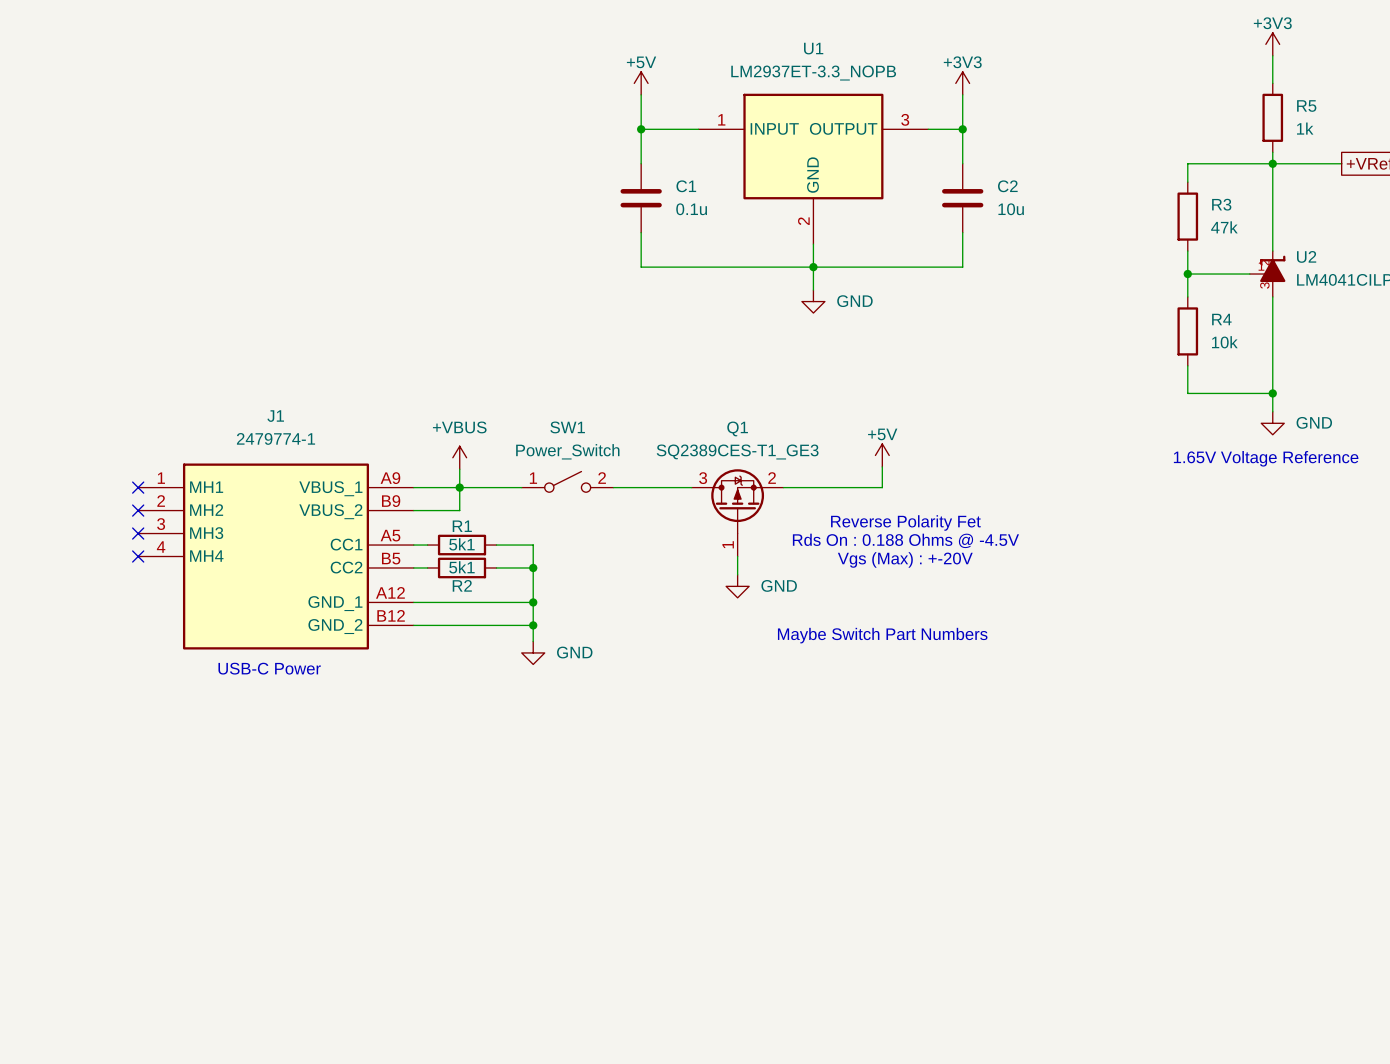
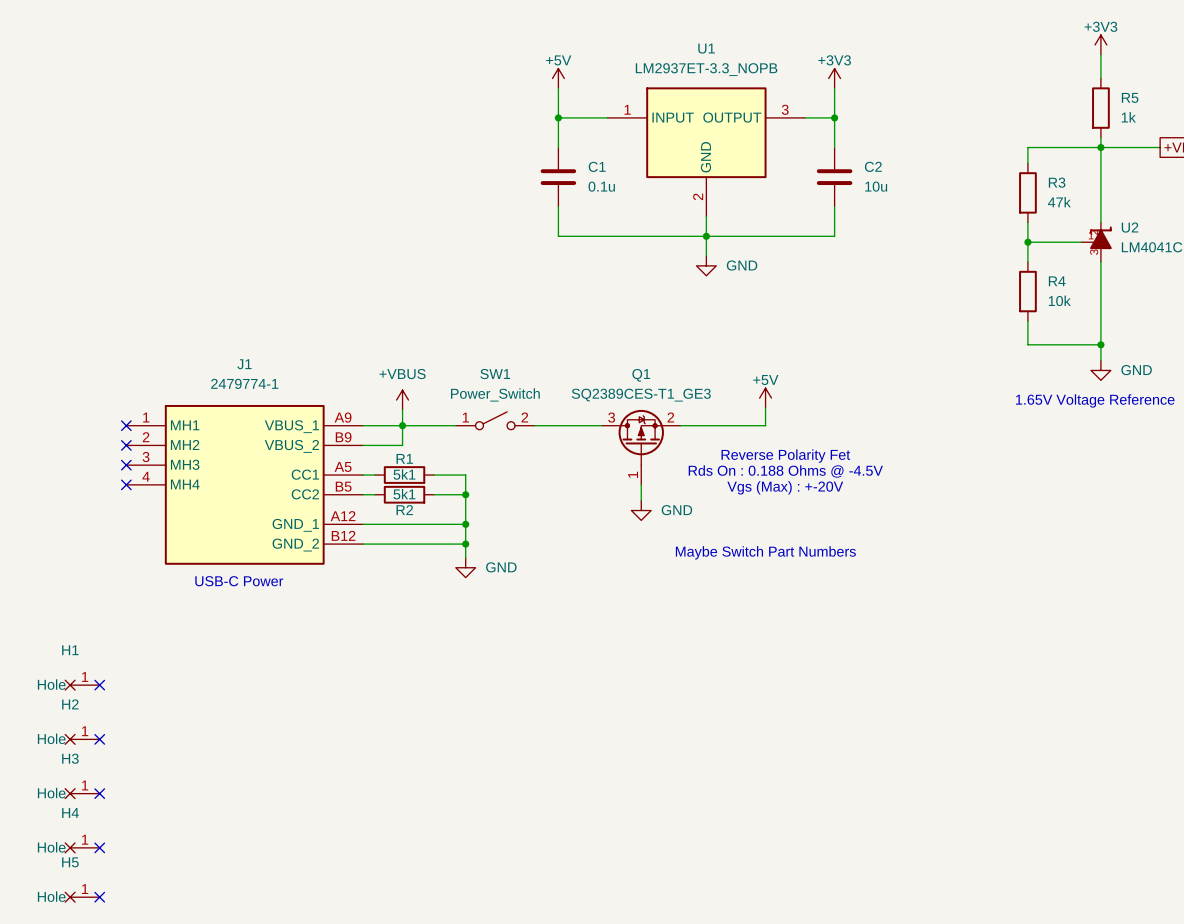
H1: none -> (82, 685)
no-connect mark: none -> (99, 685)
H2: none -> (82, 739)
no-connect mark: none -> (99, 739)
H3: none -> (82, 793)
no-connect mark: none -> (99, 793)
H4: none -> (82, 847)
no-connect mark: none -> (99, 847)
H5: none -> (82, 897)
no-connect mark: none -> (99, 897)

